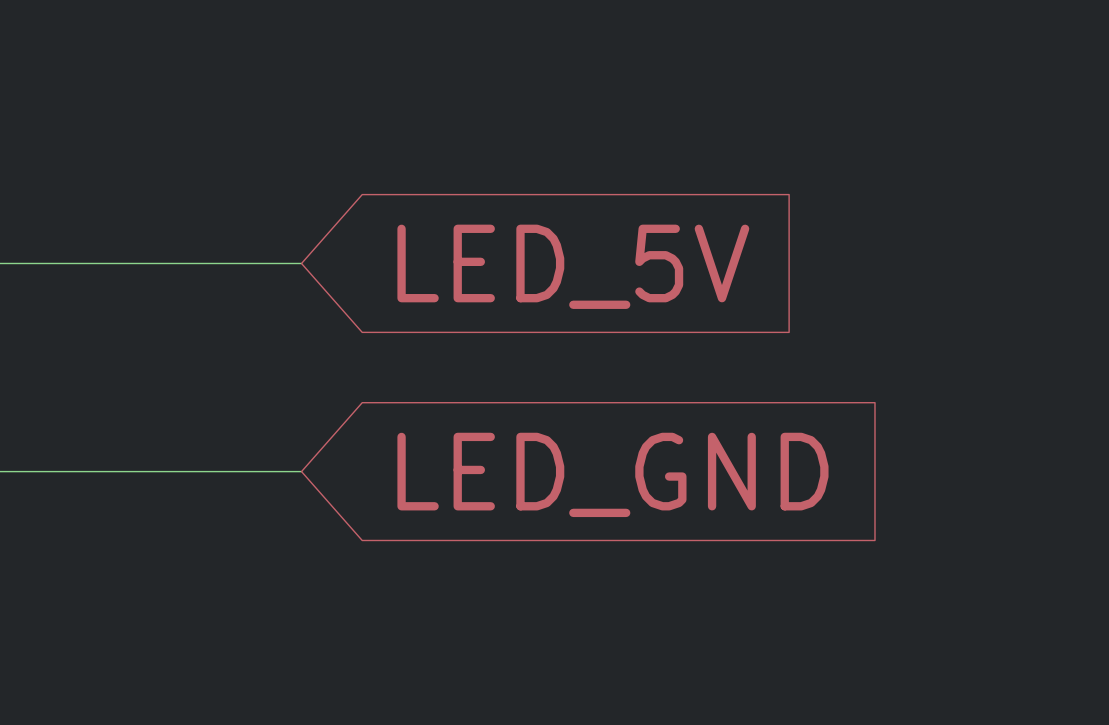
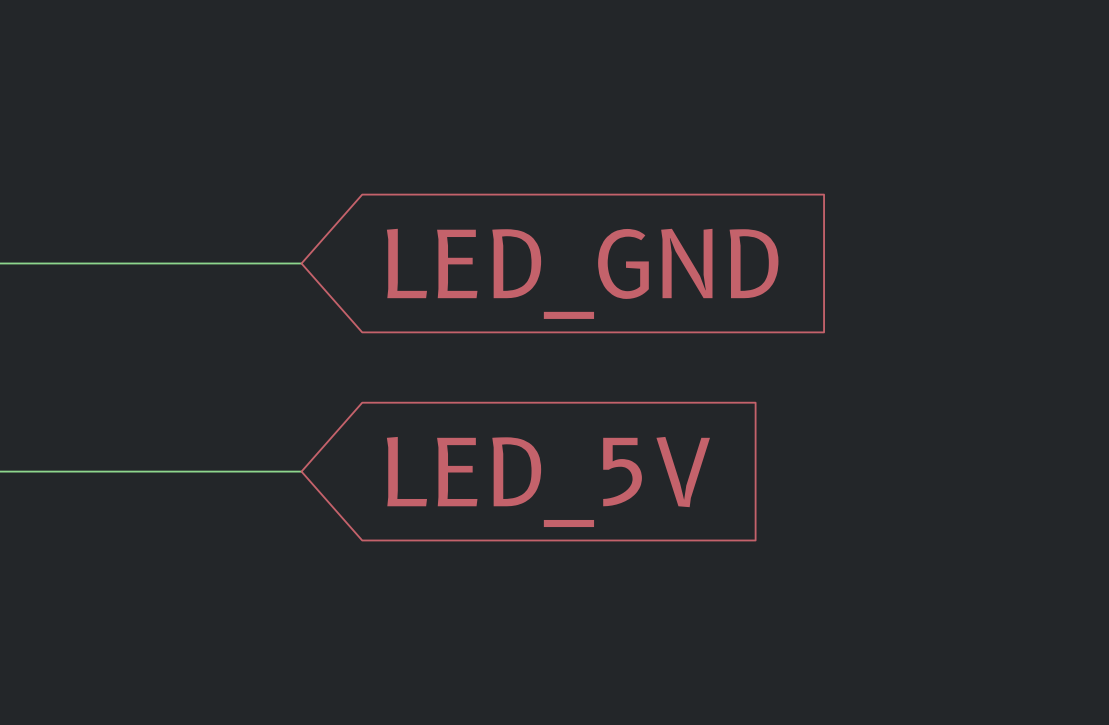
global label: LED_5V (573, 266) -> LED_GND (582, 273)
global label: LED_GND (612, 474) -> LED_5V (548, 481)

